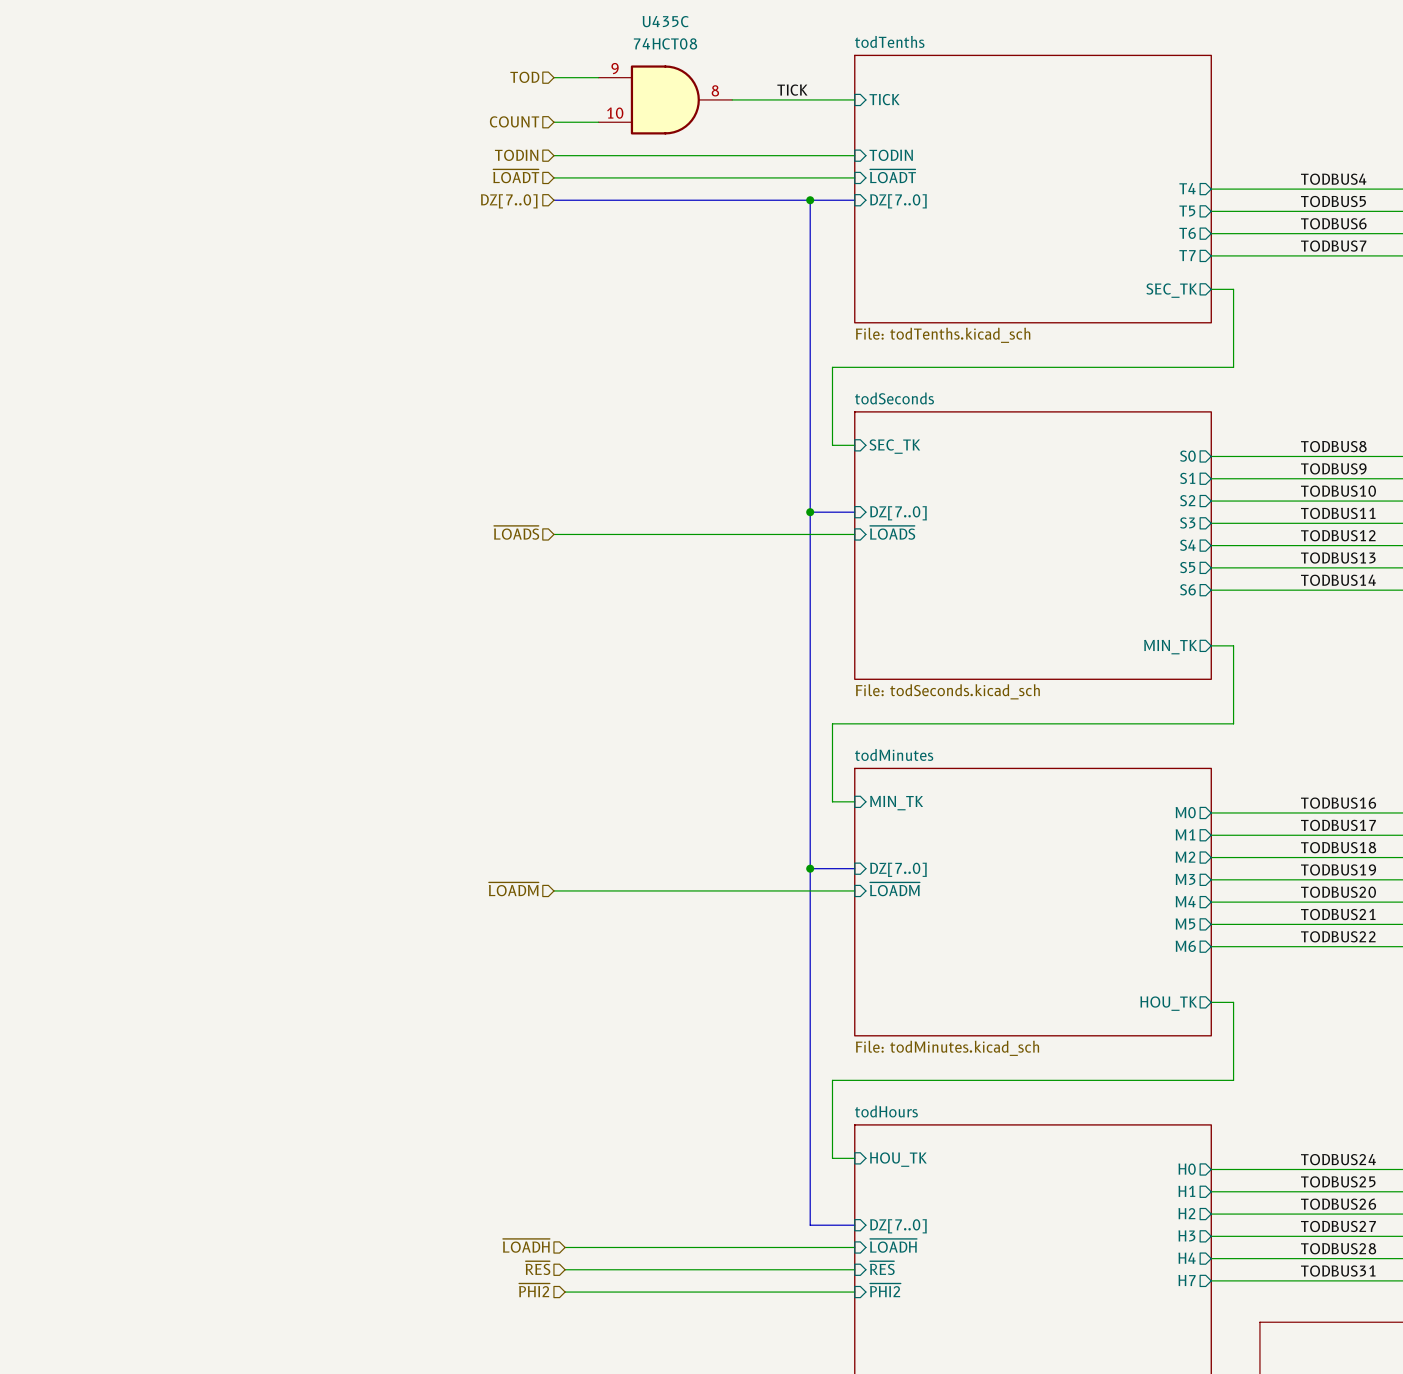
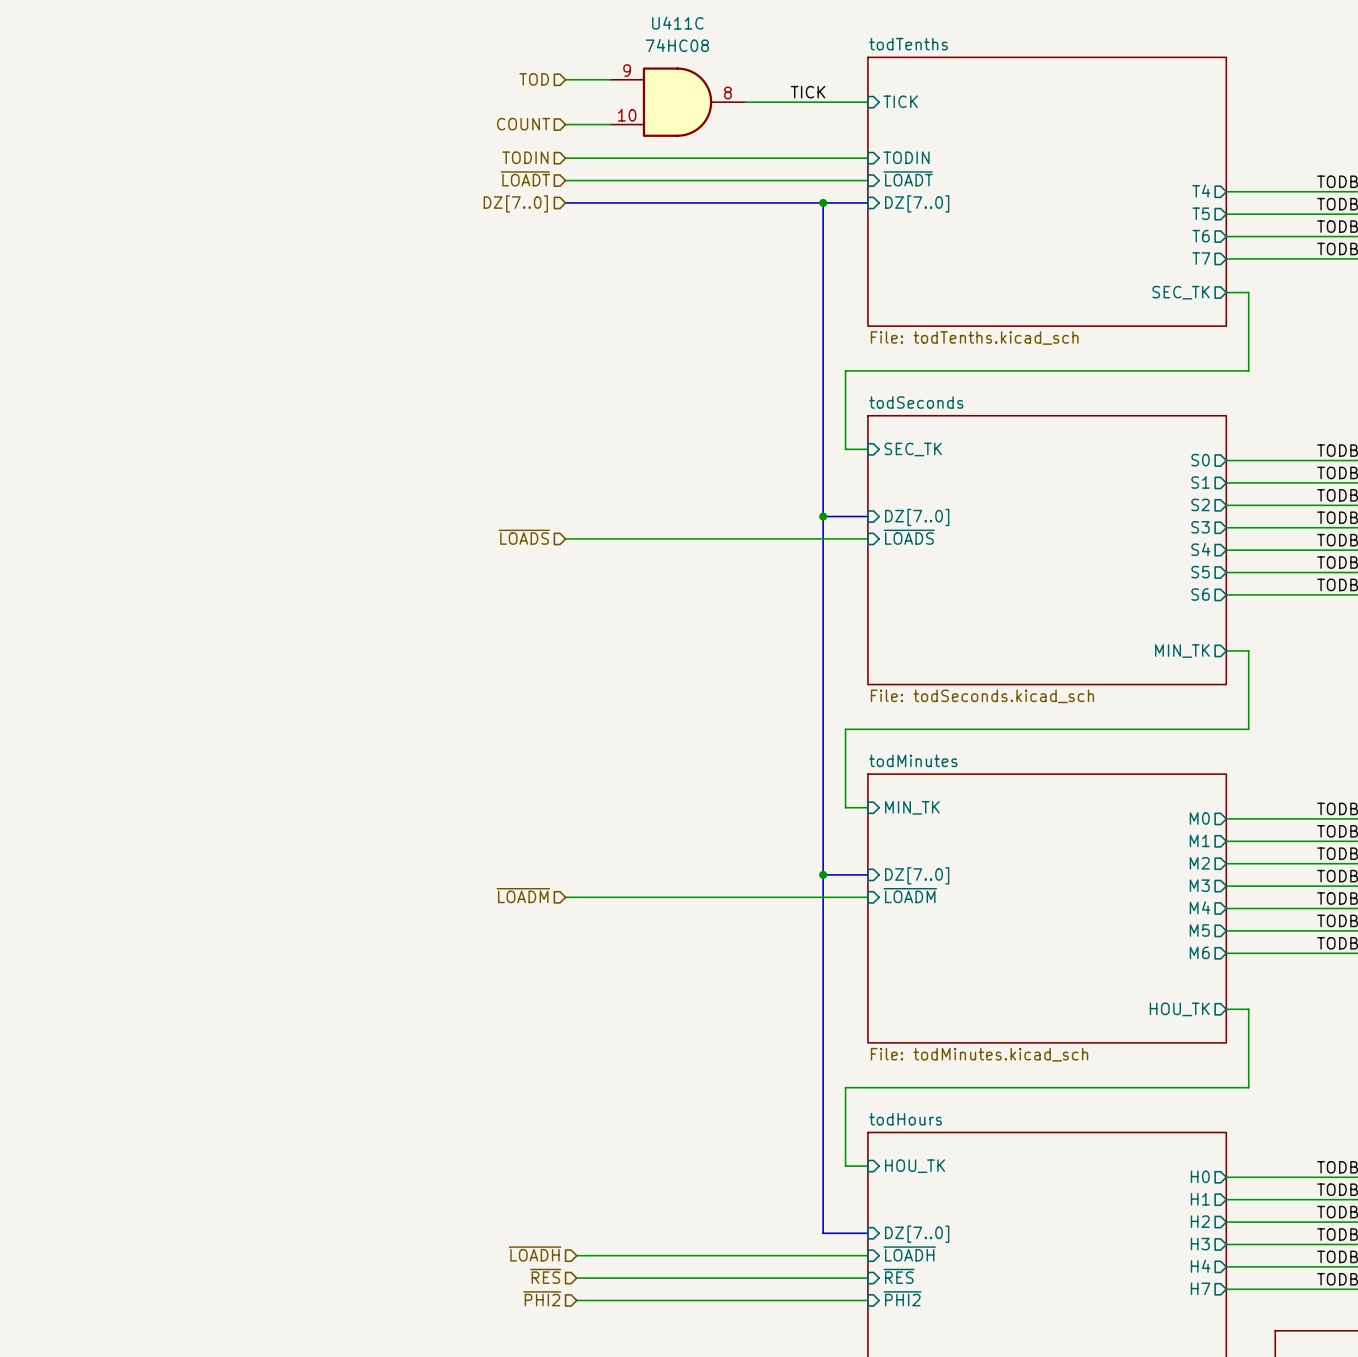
U435C name: U435C (665, 21) -> U411C (677, 23)
U435C value: 74HCT08 (665, 43) -> 74HC08 (677, 45)

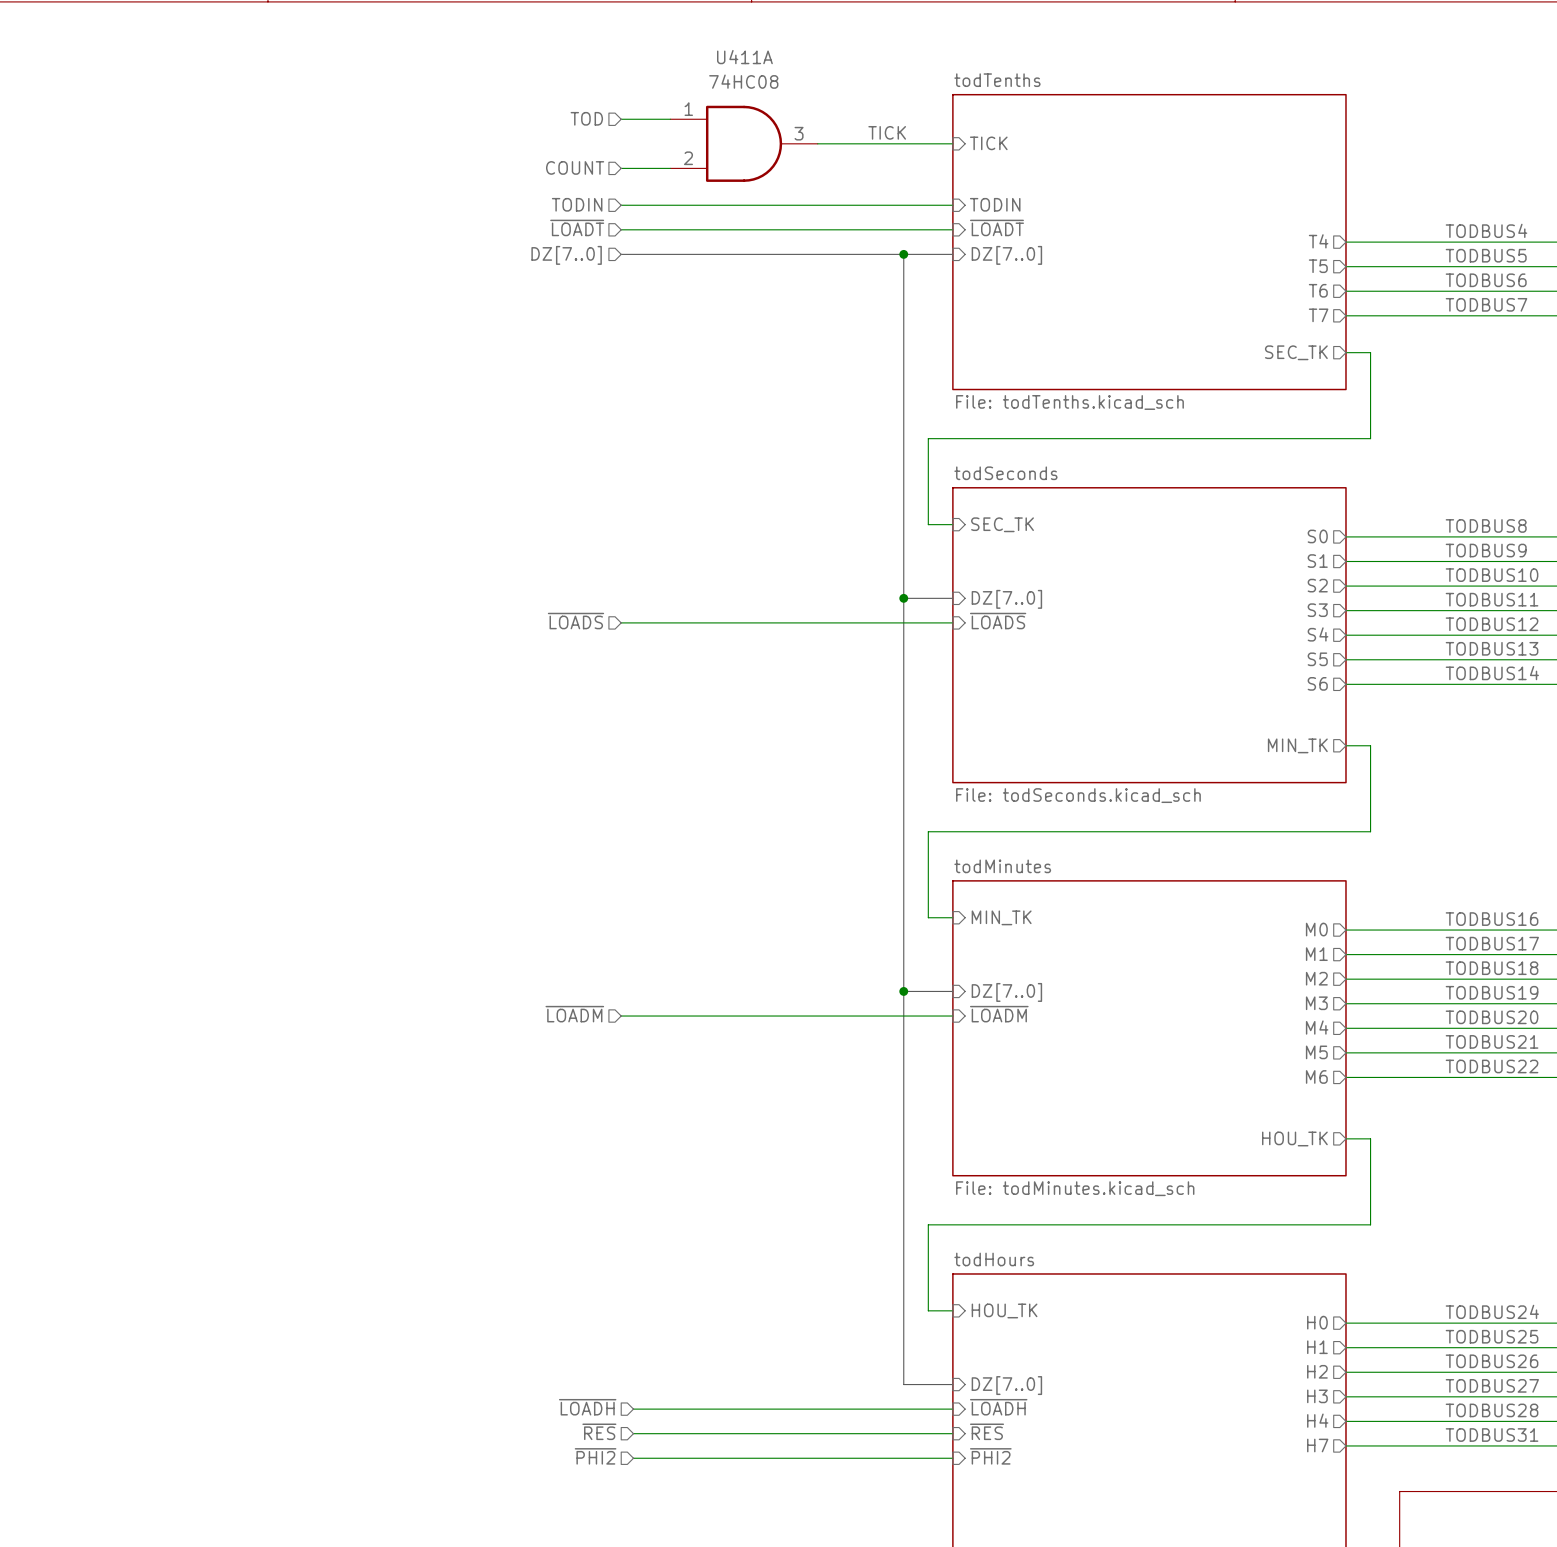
U411C name: U411C (677, 23) -> U411A (744, 57)
U411C pin number: 9 (627, 70) -> 1 (688, 109)
U411C pin number: 8 (727, 92) -> 3 (799, 133)
U411C pin number: 10 (627, 115) -> 2 (688, 158)

